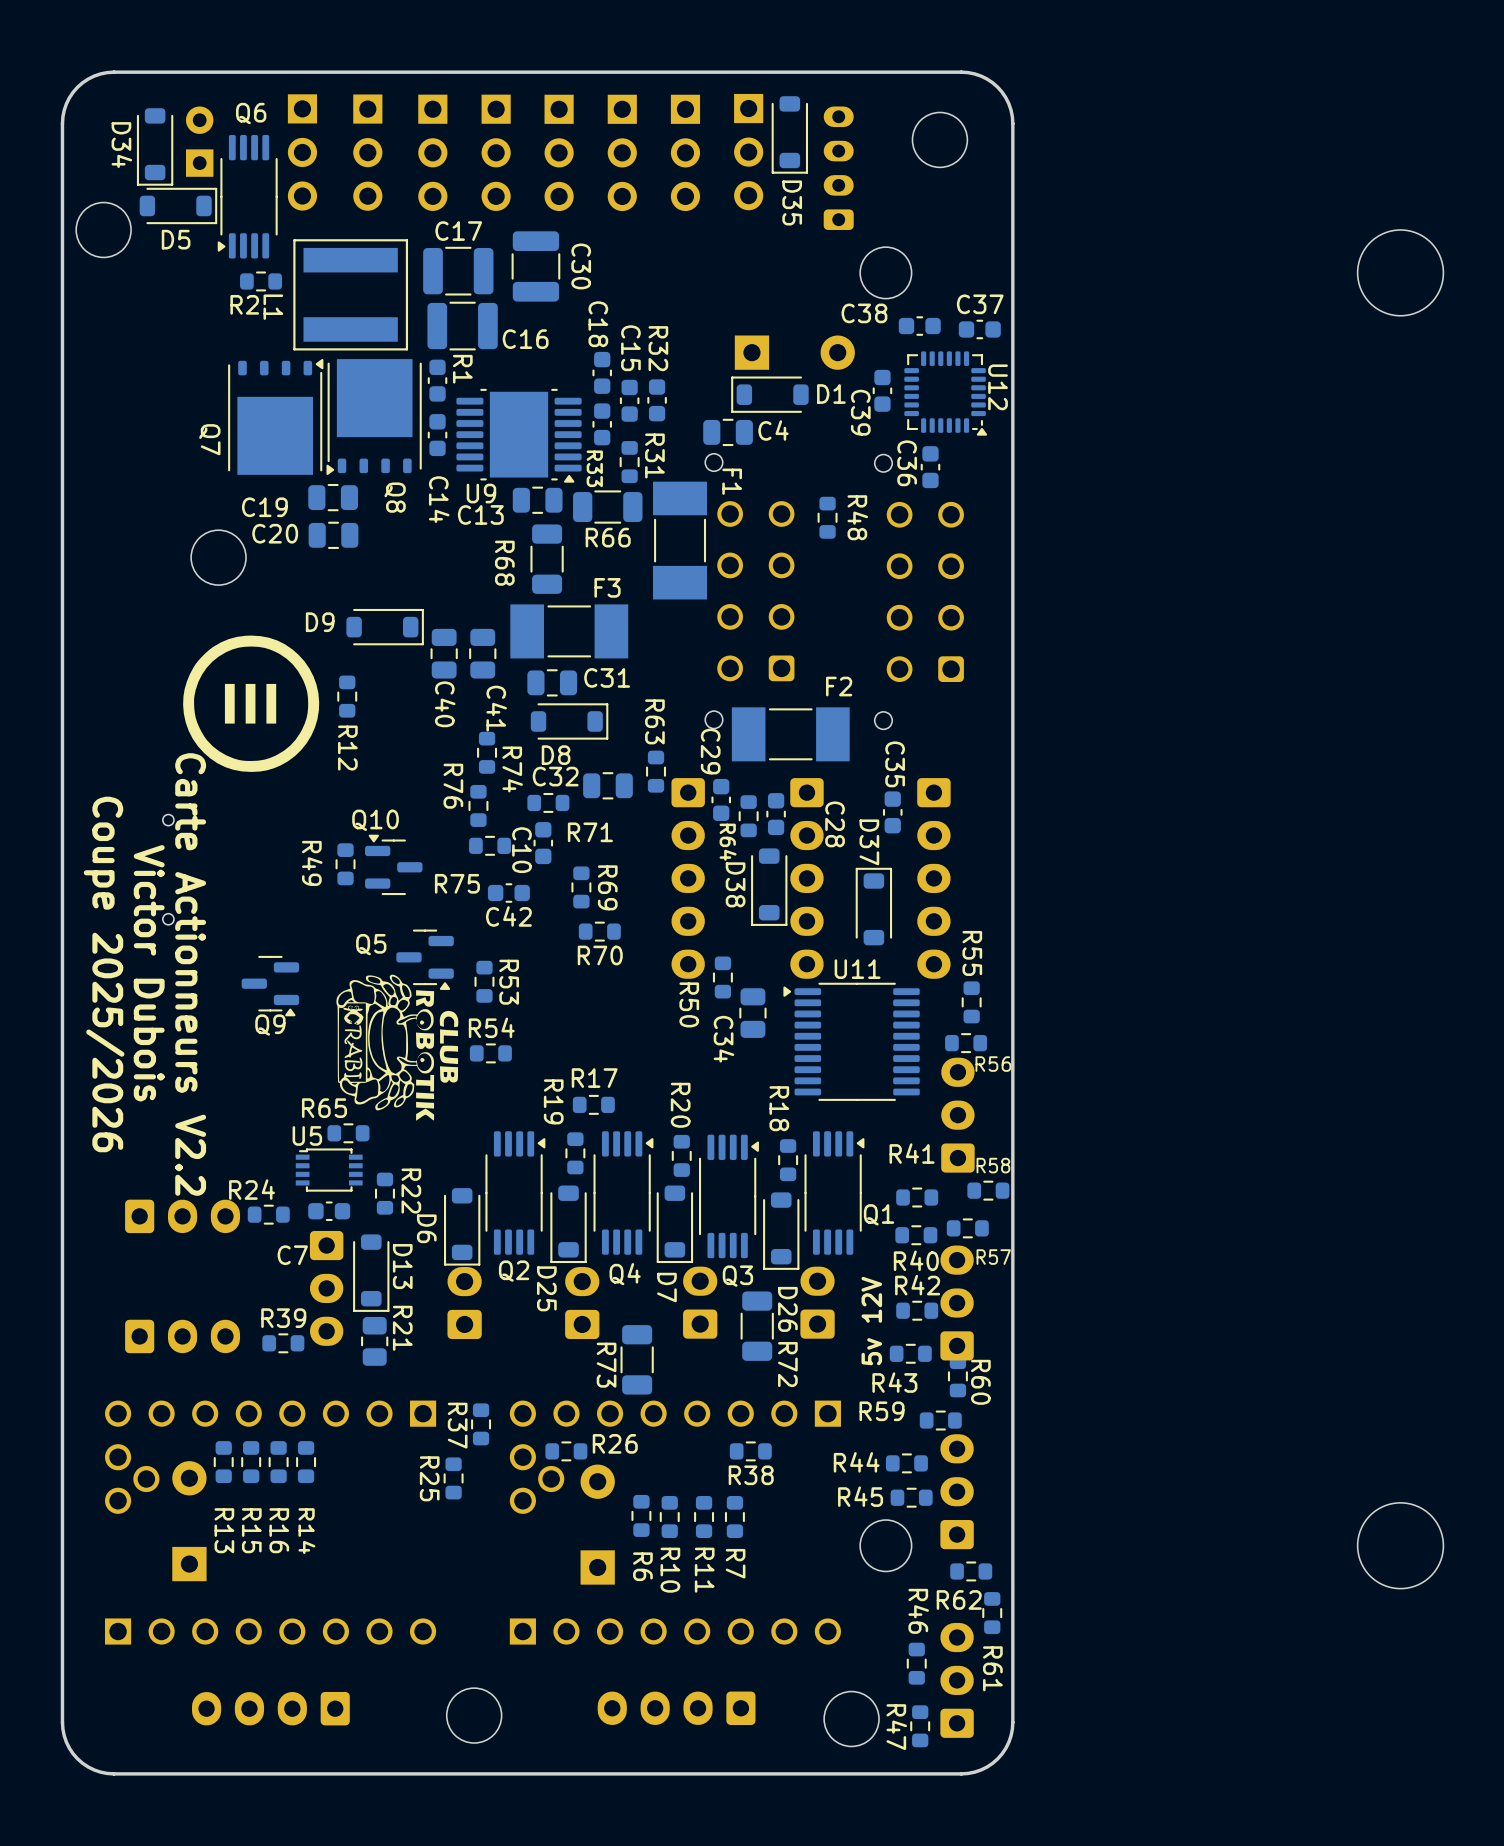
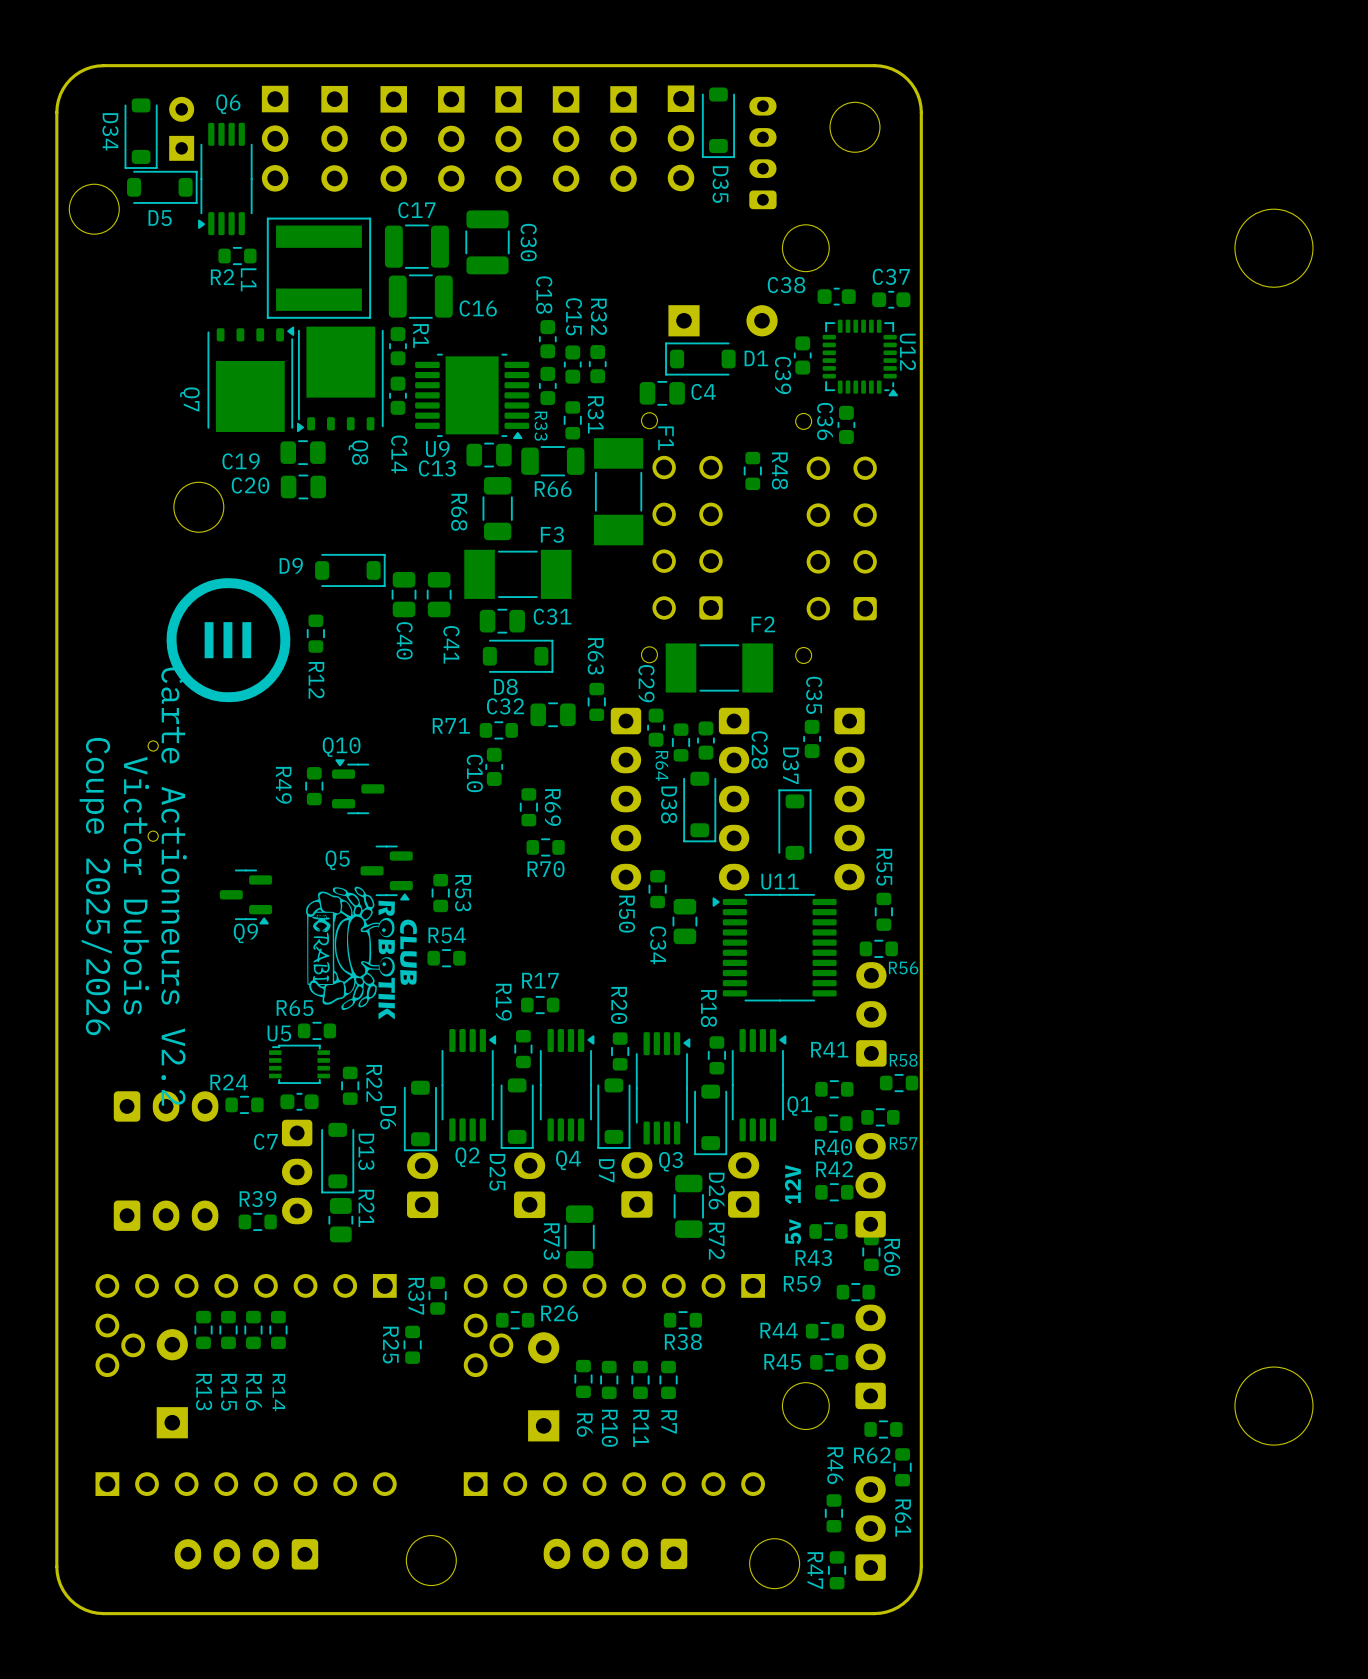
R74: (487, 752) -> none
R76: (478, 805) -> none
R71 name position: R71 (590, 832) -> R71 (451, 725)
R75: (490, 845) -> none
C42: (508, 893) -> none

